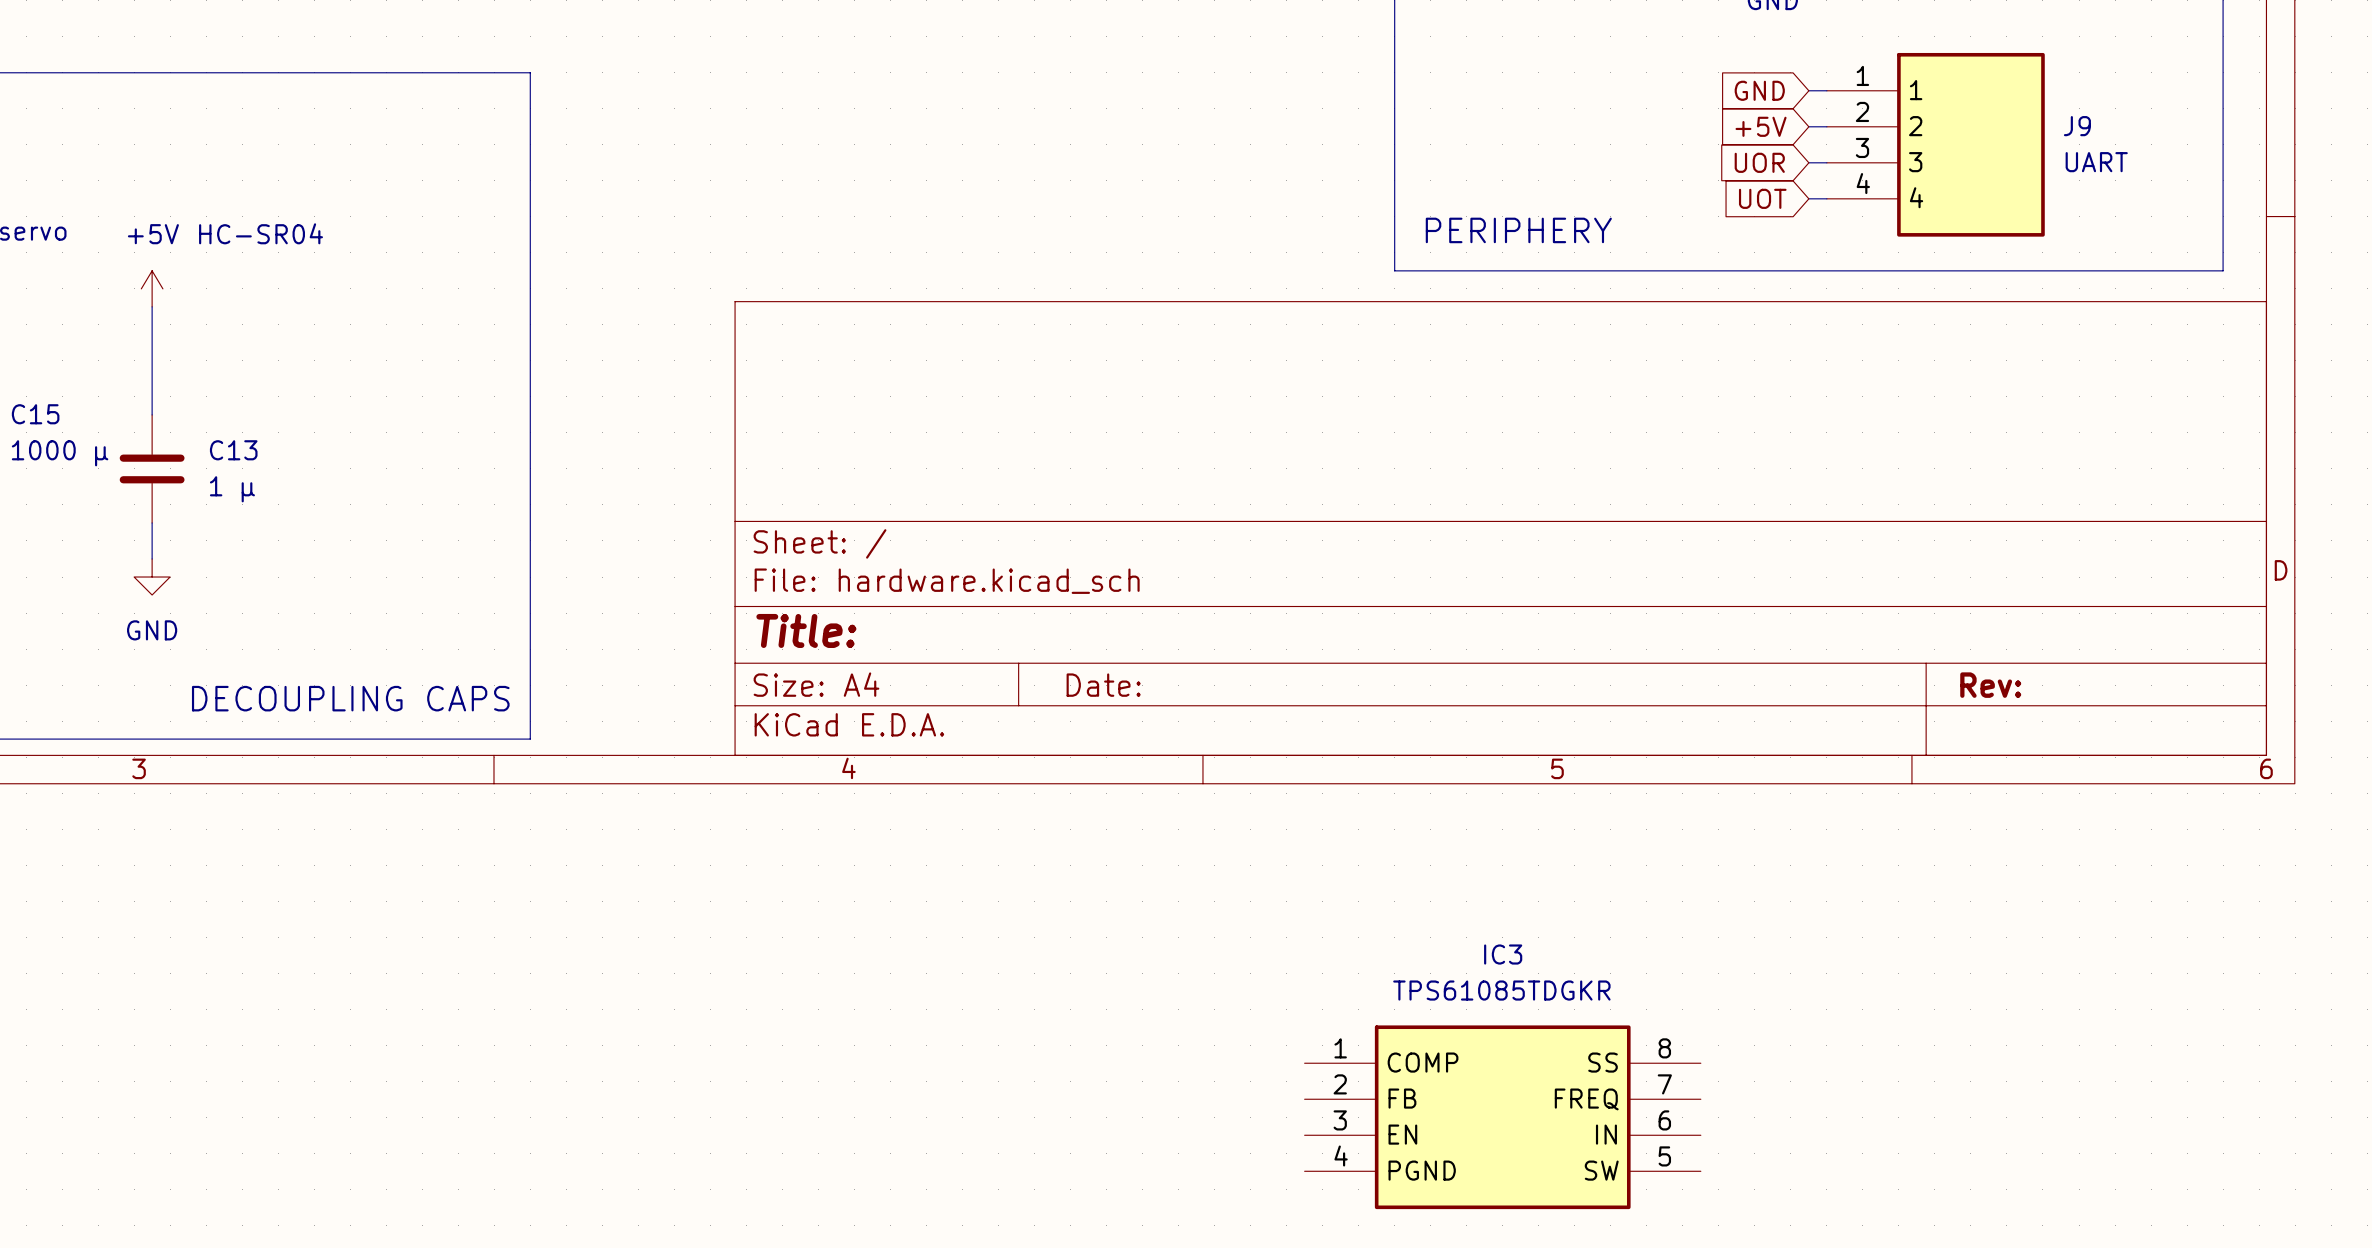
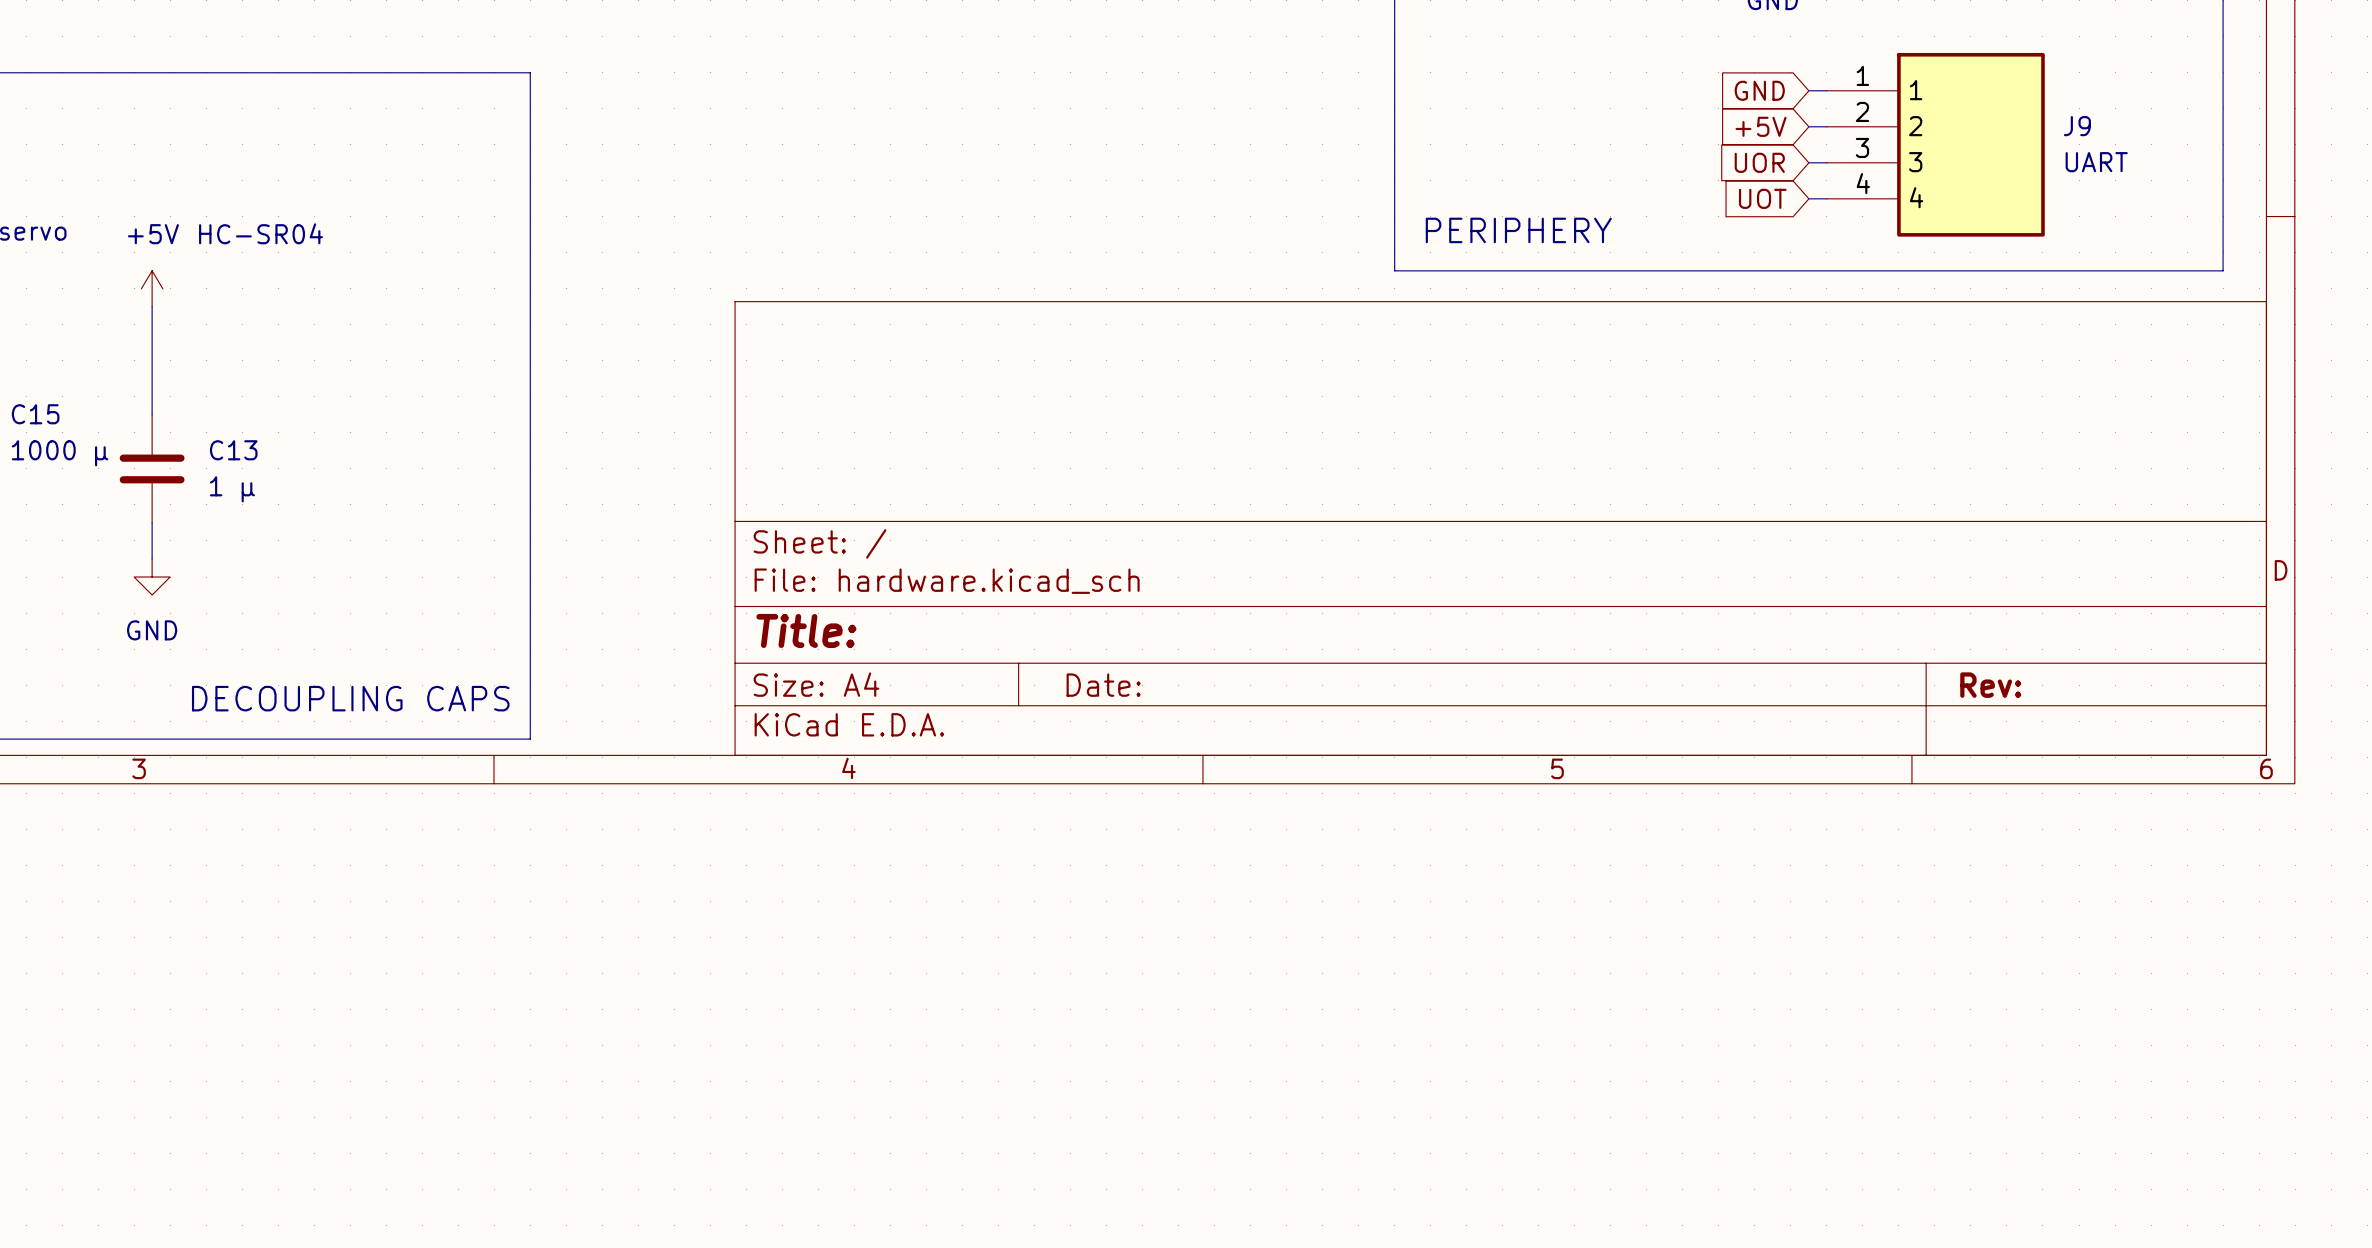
IC3: TPS61085TDGKR (1502, 1117) -> none

